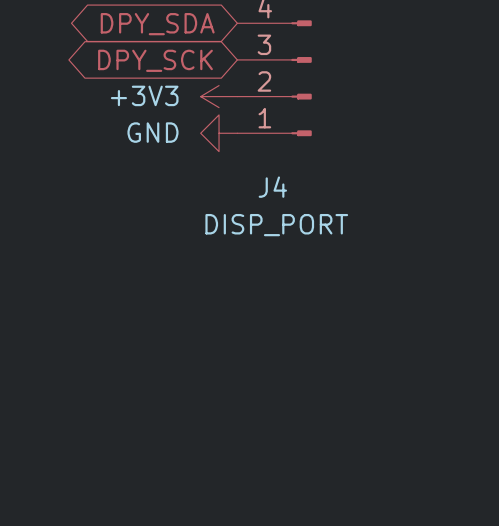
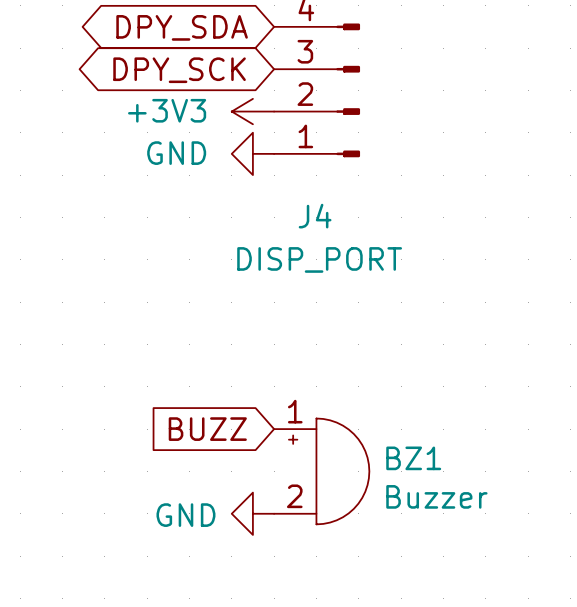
global label: none -> BUZZ (207, 429)
BZ1: none -> Buzzer (321, 471)
power symbol: none -> GND (252, 513)

